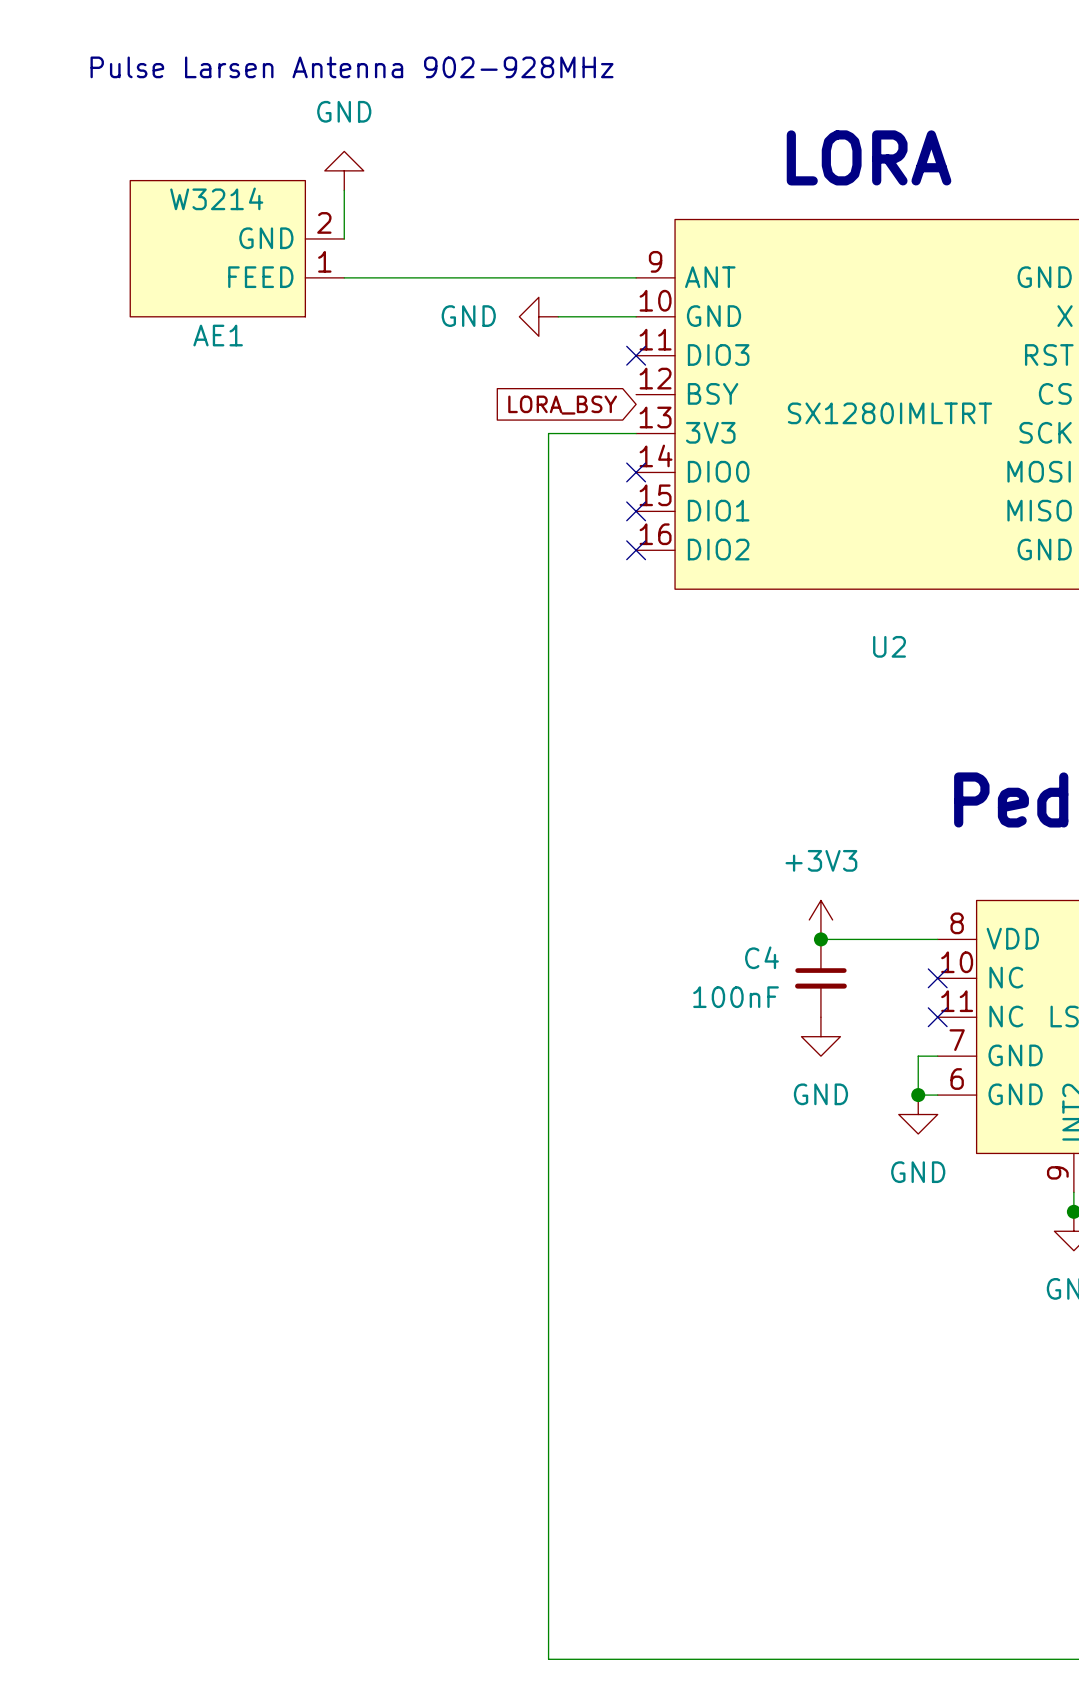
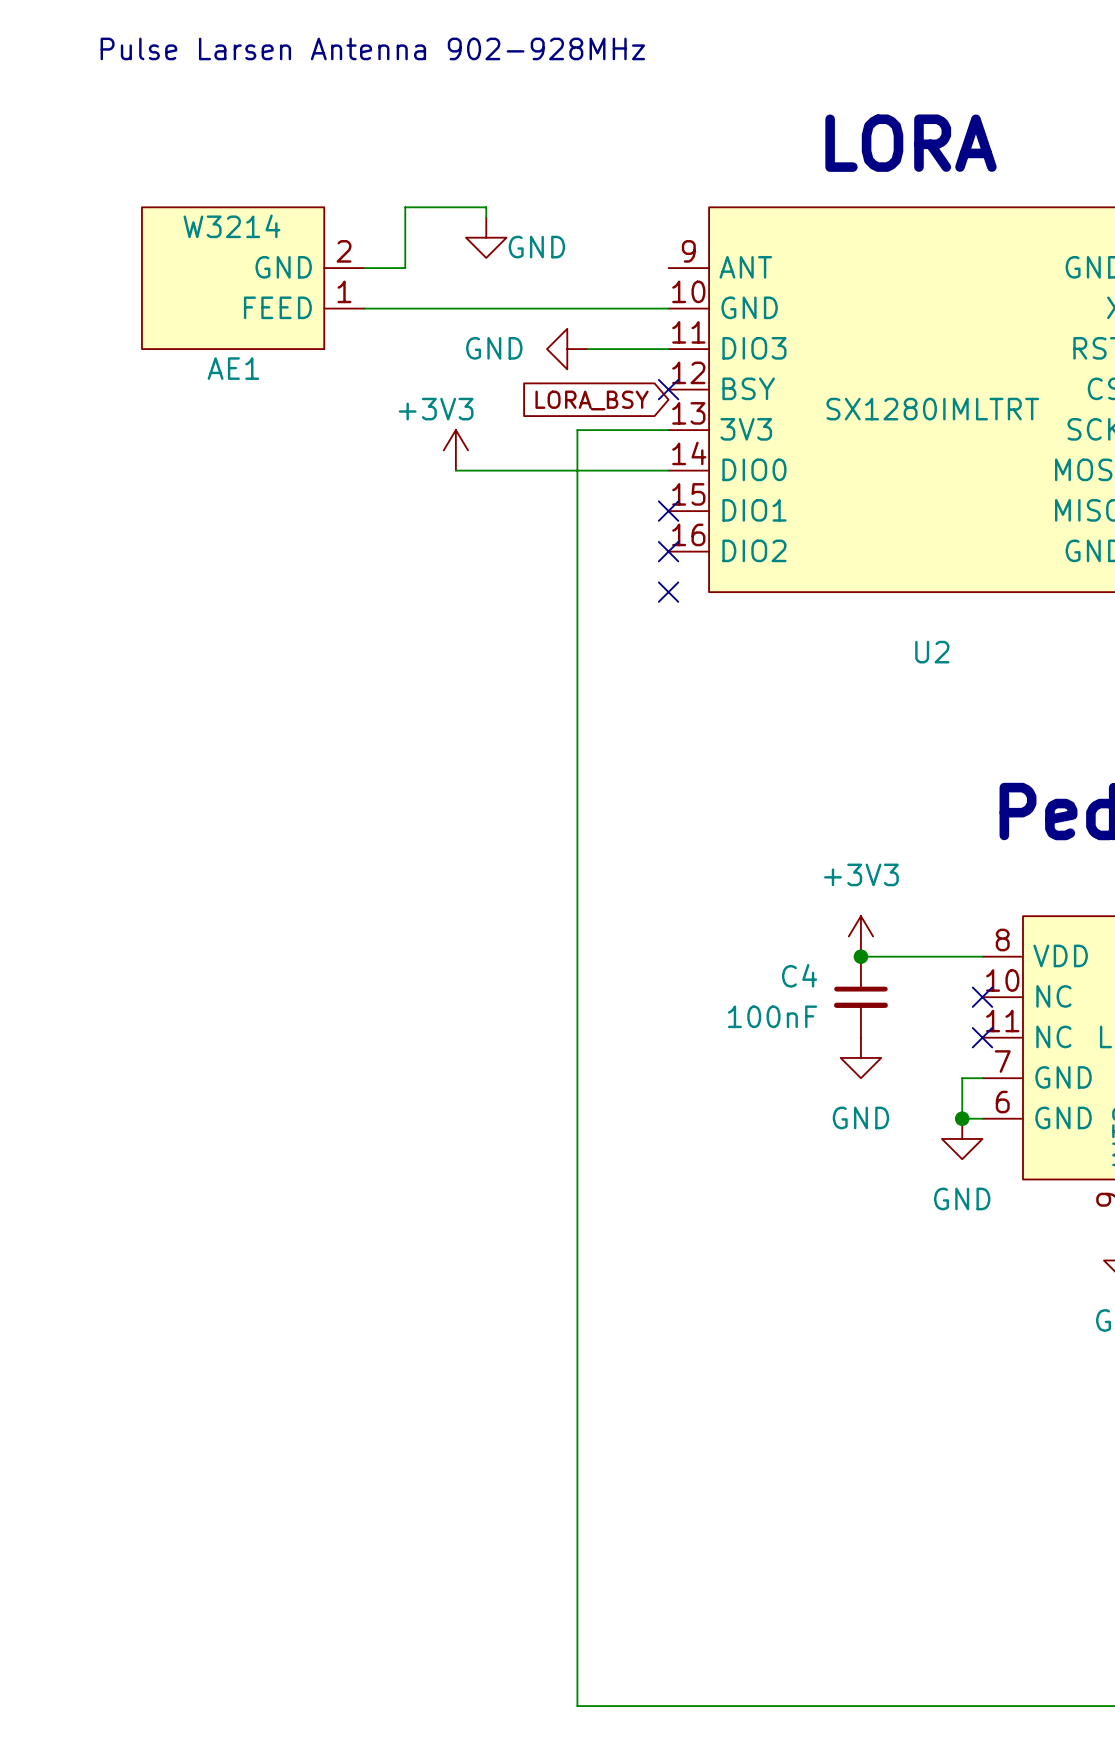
power symbol: GND (344, 170) -> none
wire: (344, 190) (344, 238) -> none
AE1 position: (237, 248) -> (253, 278)
power symbol: none -> GND (486, 237)
wire: (383, 277) (636, 277) -> (405, 268) (405, 207) (486, 207) (486, 217)
wire: none -> (364, 308) (587, 308)
power symbol position: GND (538, 316) -> GND (567, 349)
wire: none -> (587, 349) (668, 349)
no-connect mark: (636, 355) -> none
no-connect mark: none -> (668, 389)
power symbol: none -> +3V3 (455, 450)
wire: none -> (455, 470) (668, 470)
no-connect mark: (636, 472) -> none
no-connect mark: none -> (668, 592)

